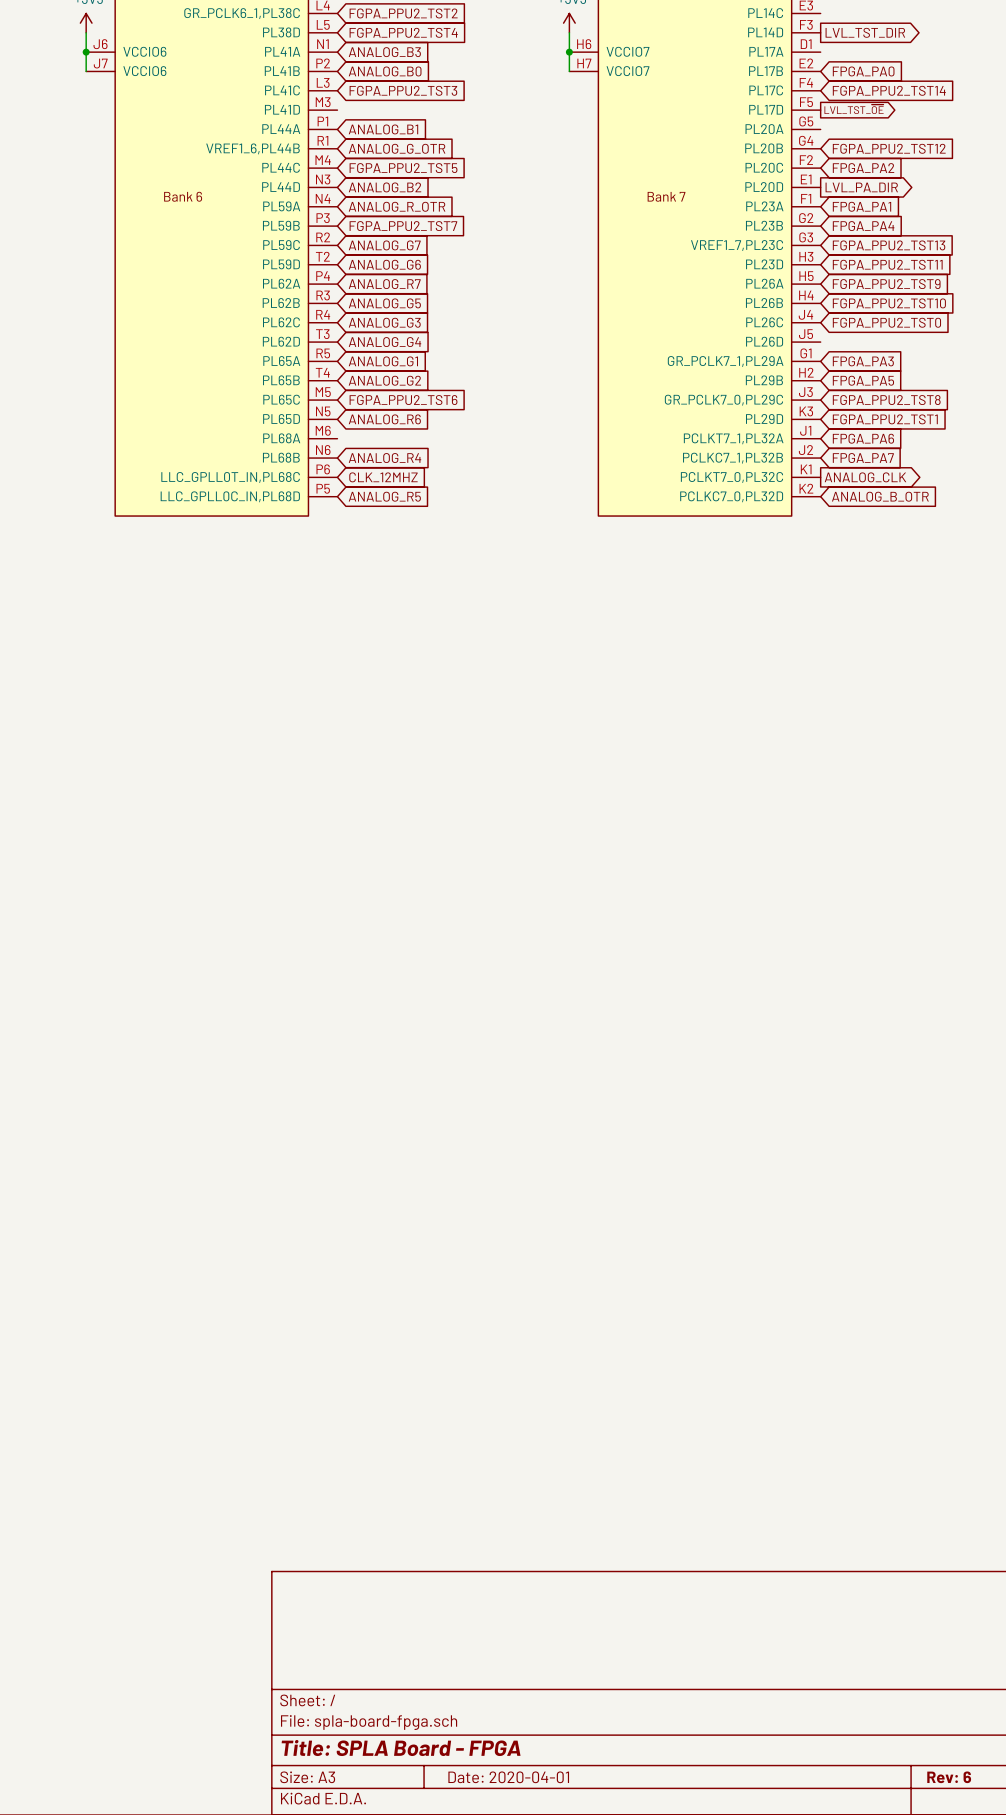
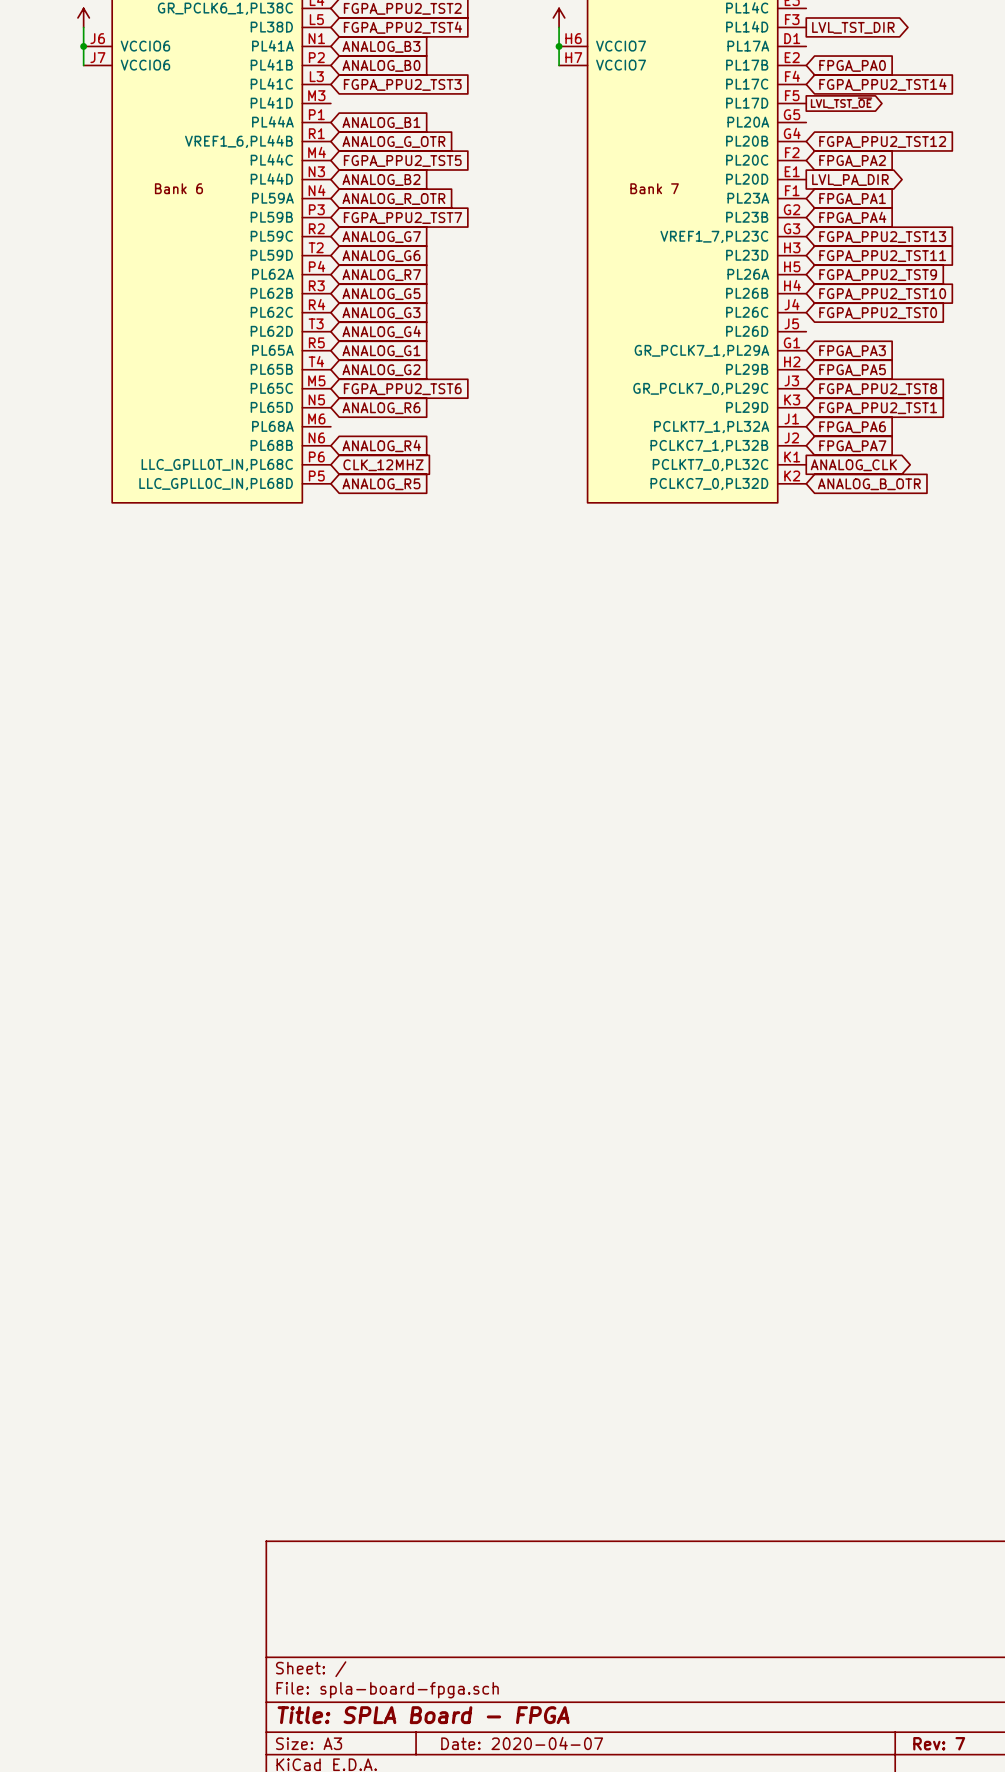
title block: Date: 2020-04-01 (508, 1777) -> Date: 2020-04-07 (522, 1743)
title block: Rev: 6 (949, 1777) -> Rev: 7 (939, 1743)

